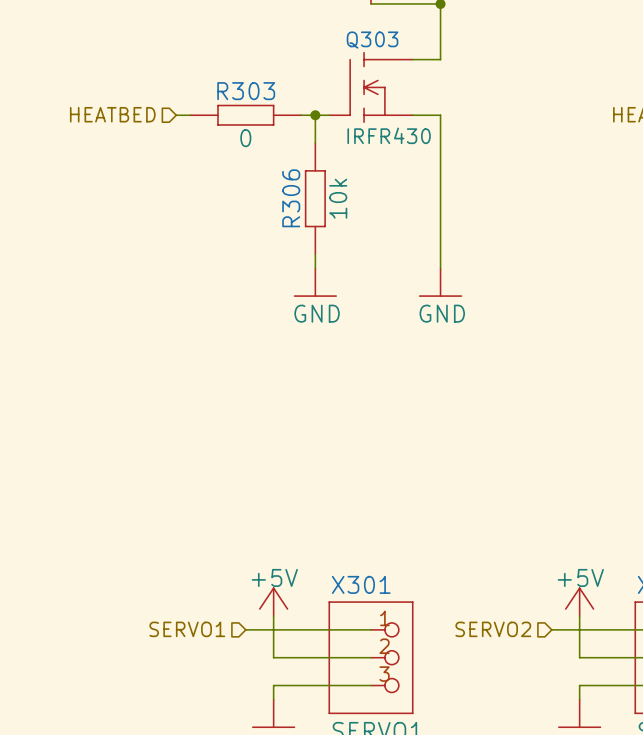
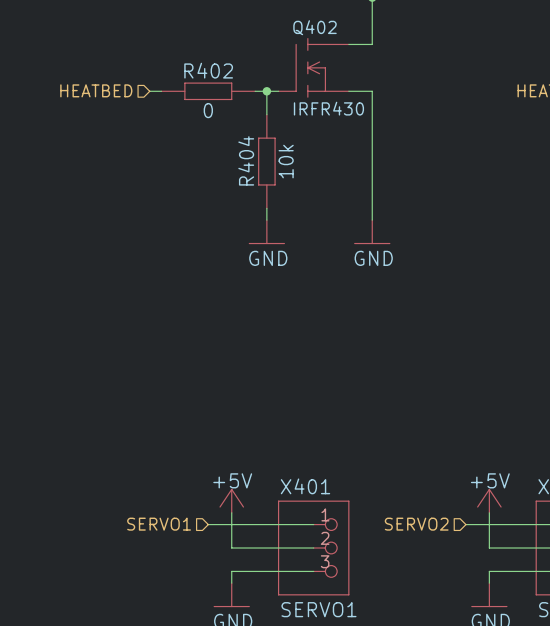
Q303 name: Q303 (372, 40) -> Q402 (315, 27)
R303 name: R303 (246, 91) -> R402 (208, 70)
R306 name: R306 (291, 198) -> R404 (246, 160)
X301 name: X301 (361, 584) -> X401 (305, 486)

